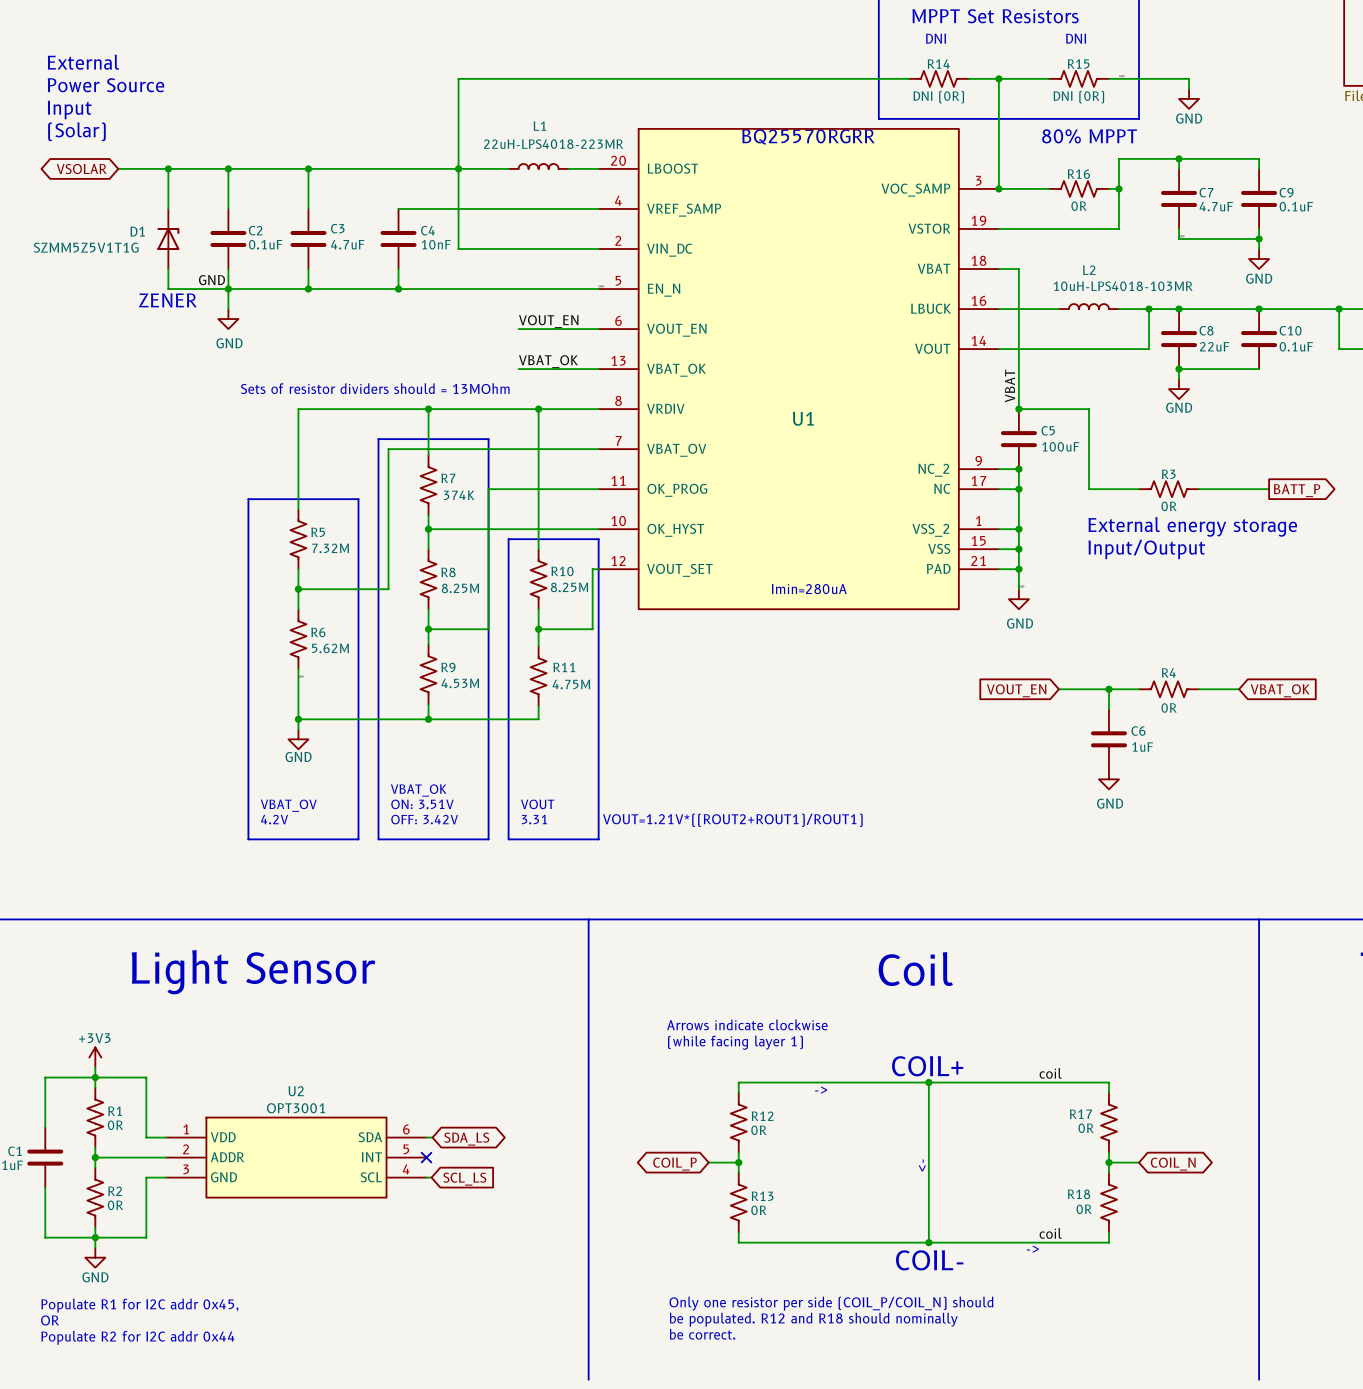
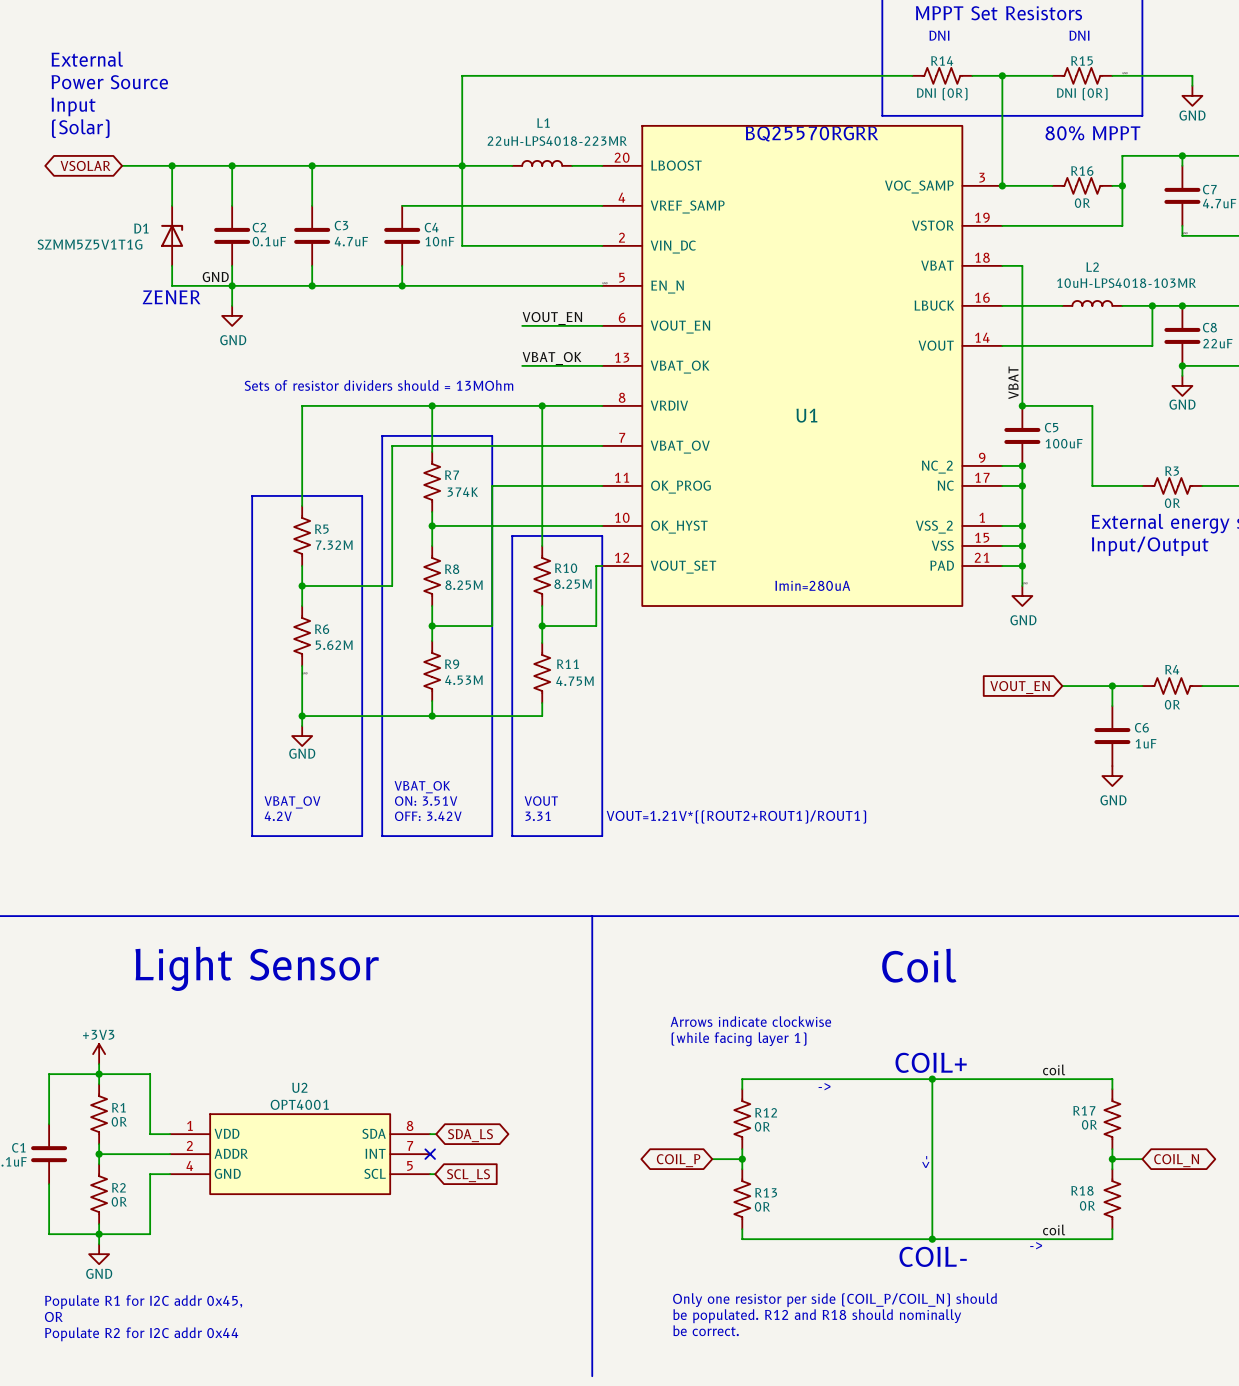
U2 value: OPT3001 (296, 1108) -> OPT4001 (299, 1104)
U2 pin number: 6 (406, 1129) -> 8 (410, 1125)
U2 pin number: 5 (406, 1149) -> 7 (410, 1145)
U2 pin number: 3 (186, 1169) -> 4 (189, 1165)
U2 pin number: 4 (406, 1169) -> 5 (410, 1165)

